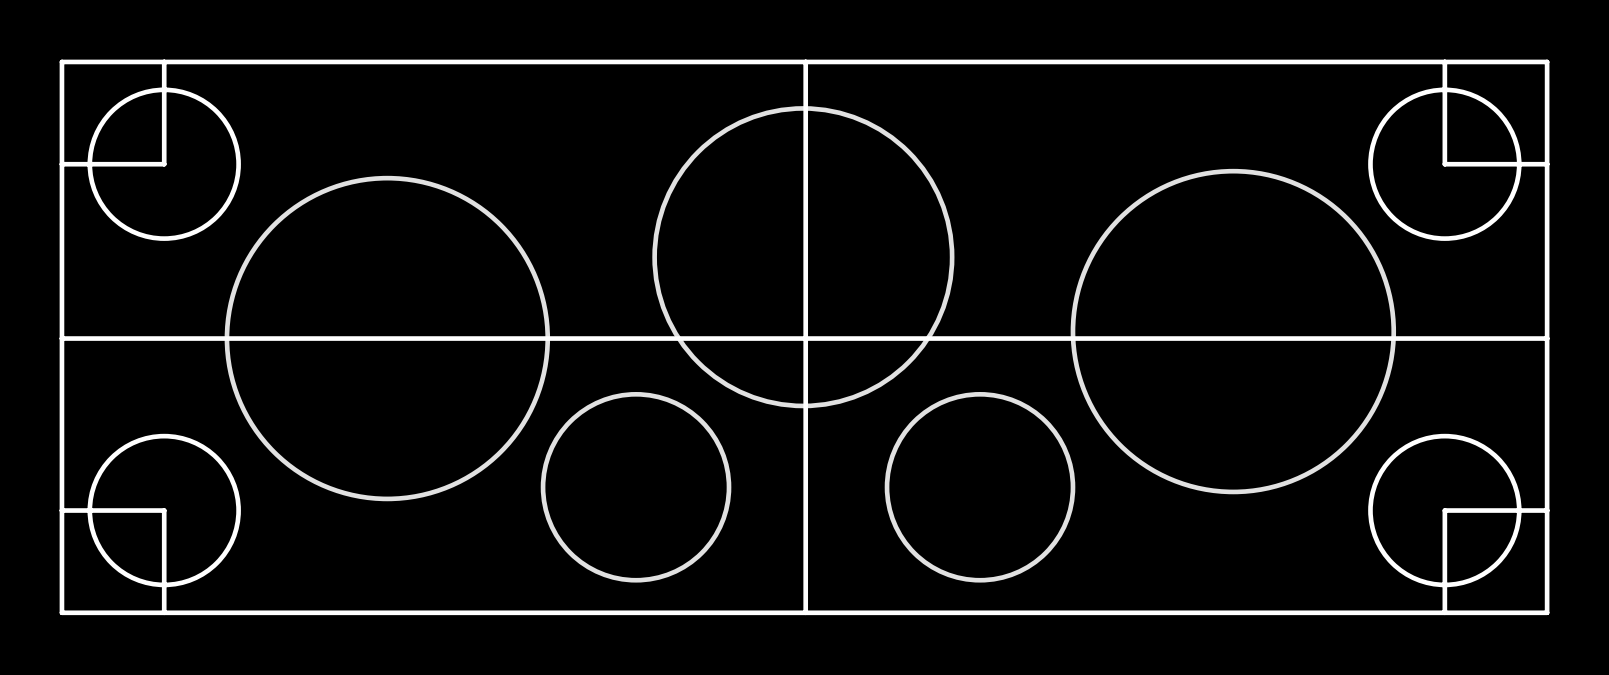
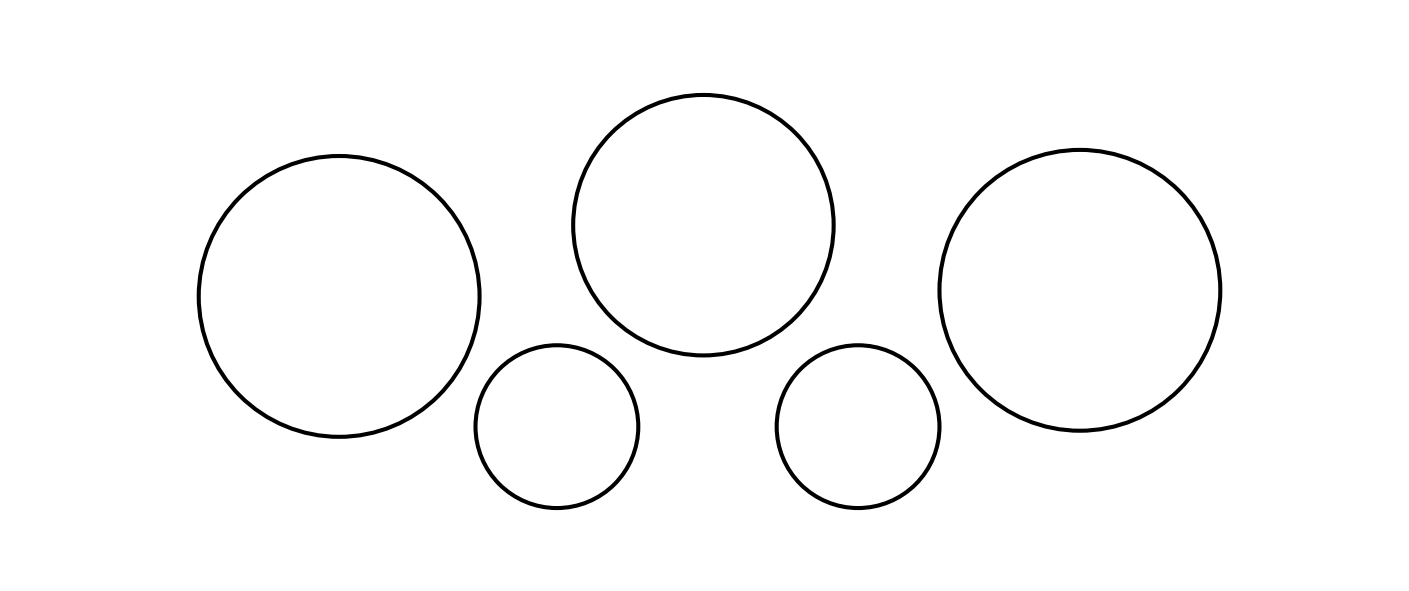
board edge: (164, 61) (164, 164) (61, 164) -> none
board edge: (805, 61) (805, 612) -> none
board edge: (1444, 61) (1444, 164) (1547, 164) -> none
round board edge: [87, 87, 241, 241] -> none
round board edge: [1368, 87, 1522, 241] -> none
board edge: (61, 338) (1547, 338) -> none
round board edge: [87, 433, 241, 588] -> none
round board edge: [1368, 433, 1522, 588] -> none
board edge: (61, 510) (164, 510) (164, 612) -> none
board edge: (1547, 510) (1444, 510) (1444, 612) -> none
board edge: (61, 612) (1547, 612) (1547, 61) (61, 61) (61, 612) -> none

